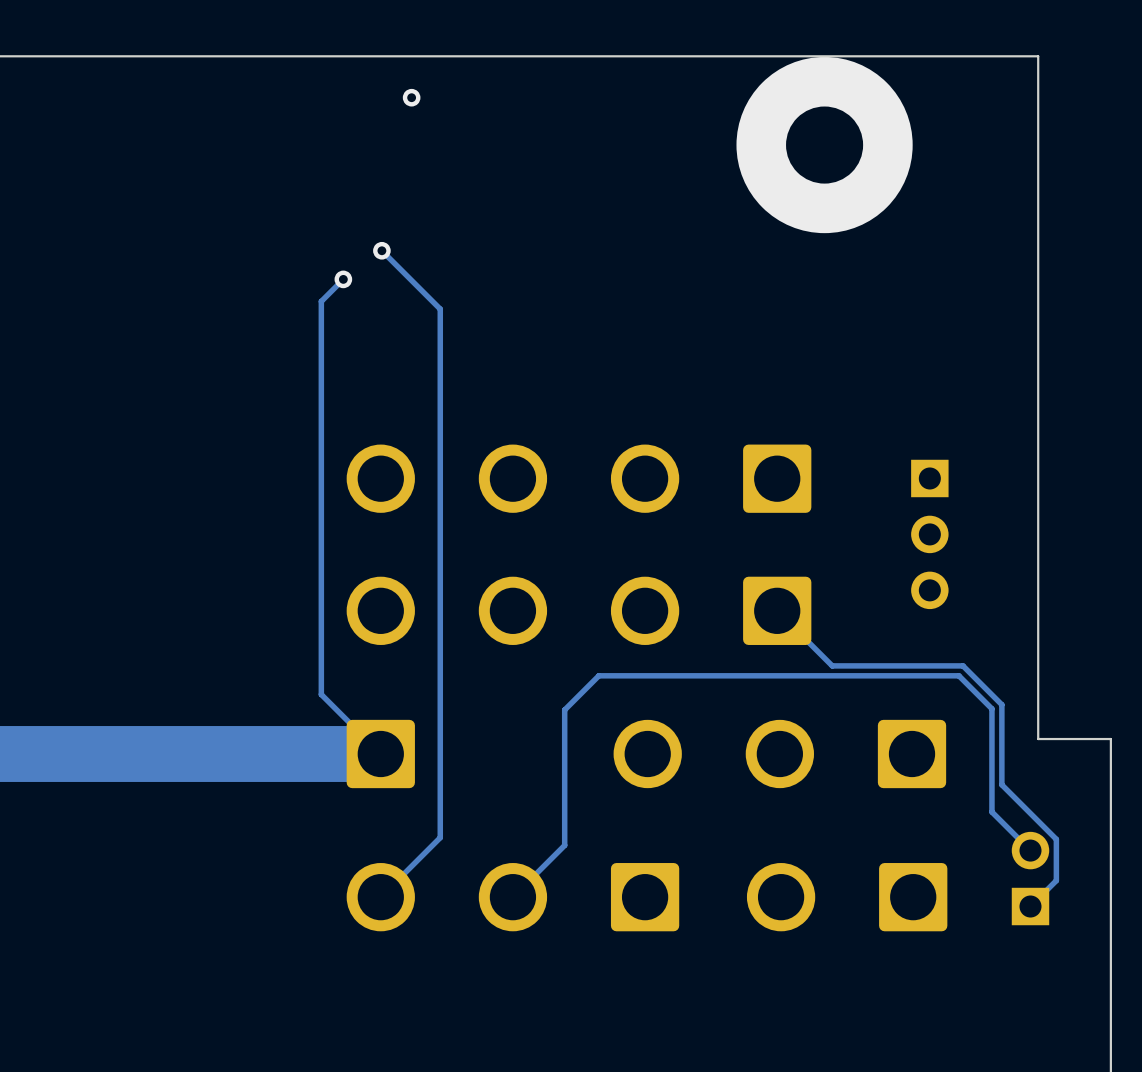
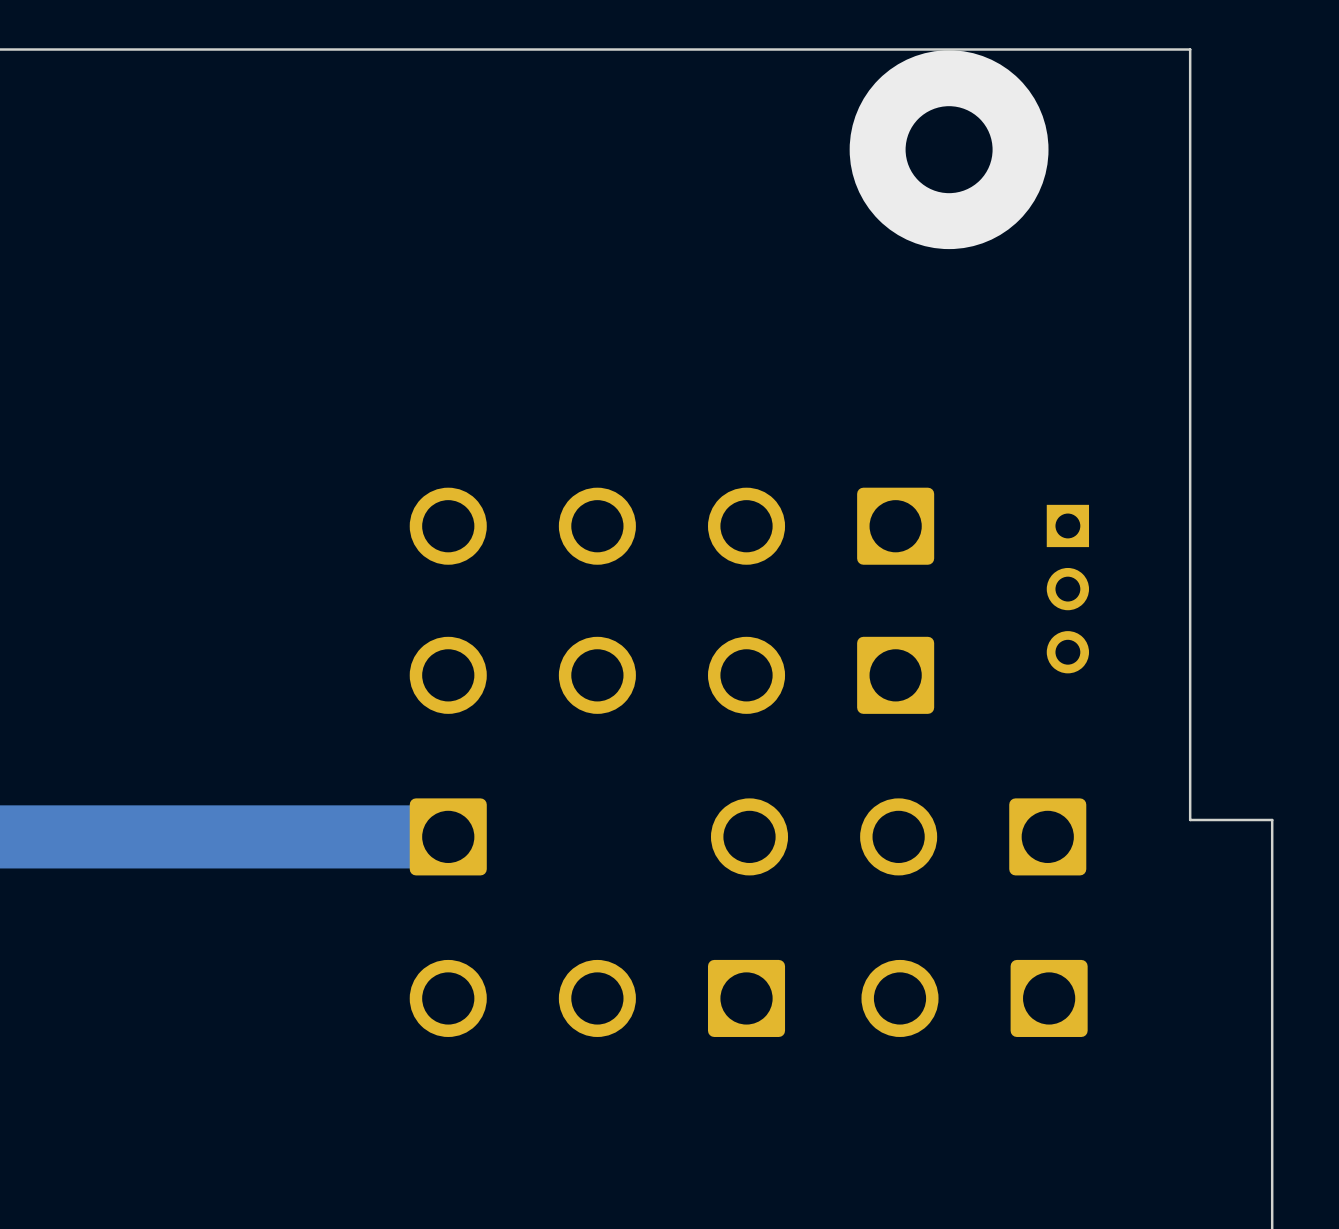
via: (411, 97) -> none
track: (381, 250) (440, 309) (440, 837) (380, 897) -> none
via: (381, 250) -> none
track: (343, 279) (321, 301) (321, 694) (380, 754) -> none
via: (343, 279) -> none
track: (777, 610) (832, 665) (963, 665) (1001, 704) (1001, 784) (1056, 839) (1056, 880) (1030, 906) -> none
track: (1030, 850) (991, 812) (991, 708) (958, 675) (598, 675) (564, 709) (564, 845) (512, 897) -> none
part: (1030, 878) -> none

